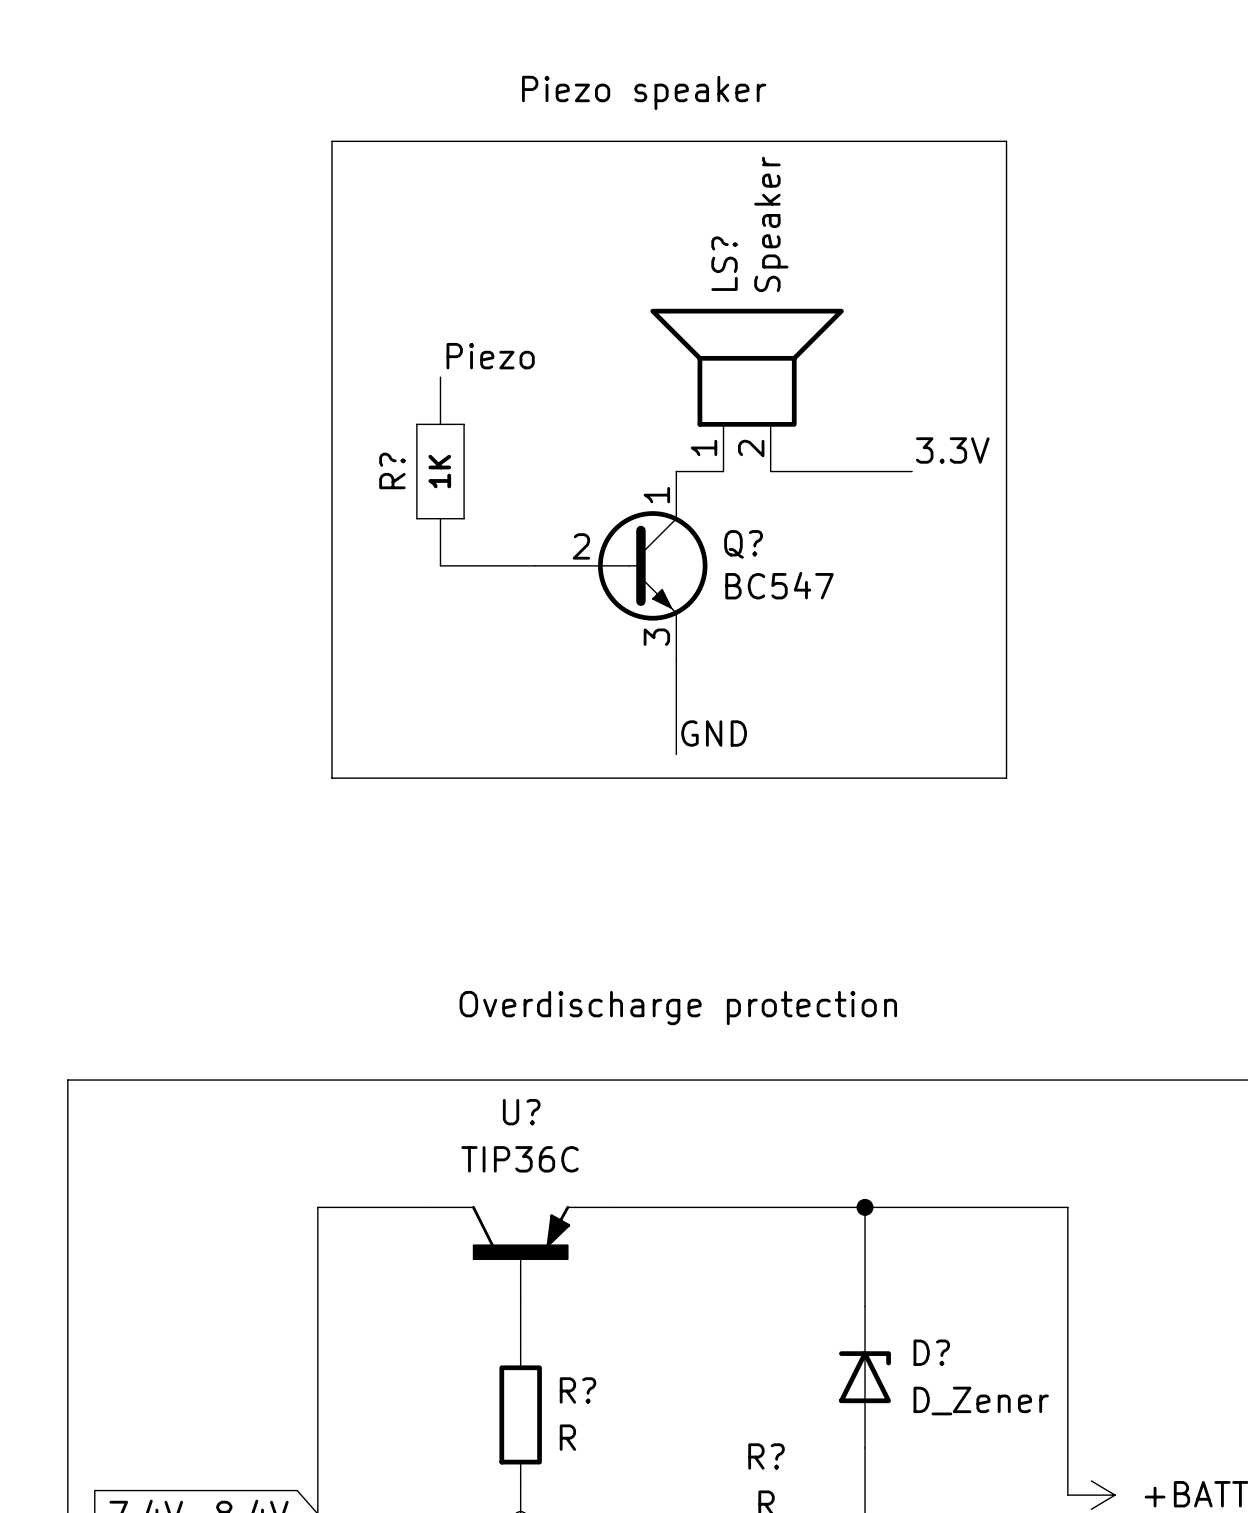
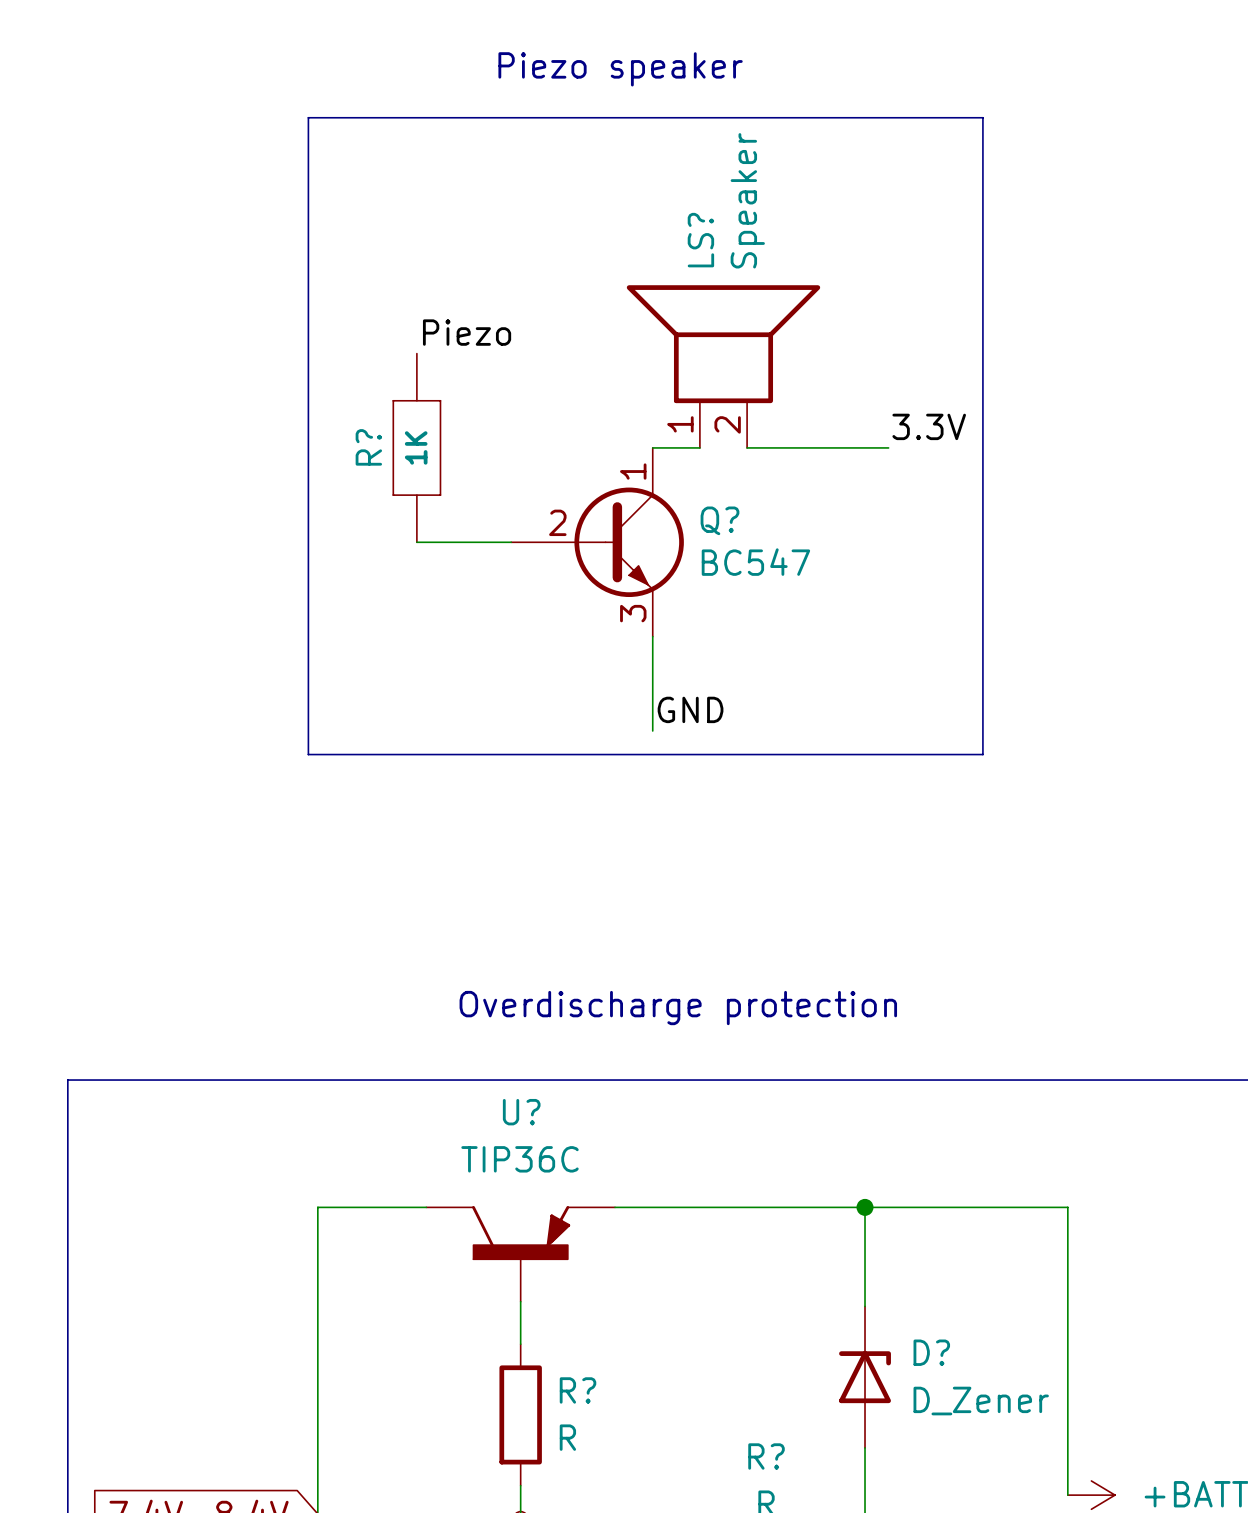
text position: Piezo speaker (644, 92) -> Piezo speaker (620, 69)
line: (331, 141) (331, 778) (1006, 778) (1006, 141) (331, 141) -> (308, 117) (308, 754) (982, 754) (982, 117) (308, 117)
label position: Piezo (490, 356) -> Piezo (467, 332)
LS? position: (747, 390) -> (723, 366)
label position: 3.3V (952, 450) -> 3.3V (929, 426)
R? position: (440, 471) -> (416, 447)
wire: (676, 471) (723, 471) -> (652, 447) (699, 447)
wire: (770, 471) (912, 471) -> (747, 447) (888, 447)
wire: (440, 565) (534, 565) -> (416, 542) (511, 542)
Q? position: (621, 565) -> (597, 542)
wire: (676, 660) (676, 754) -> (652, 636) (652, 730)
label position: GND (714, 733) -> GND (690, 709)

